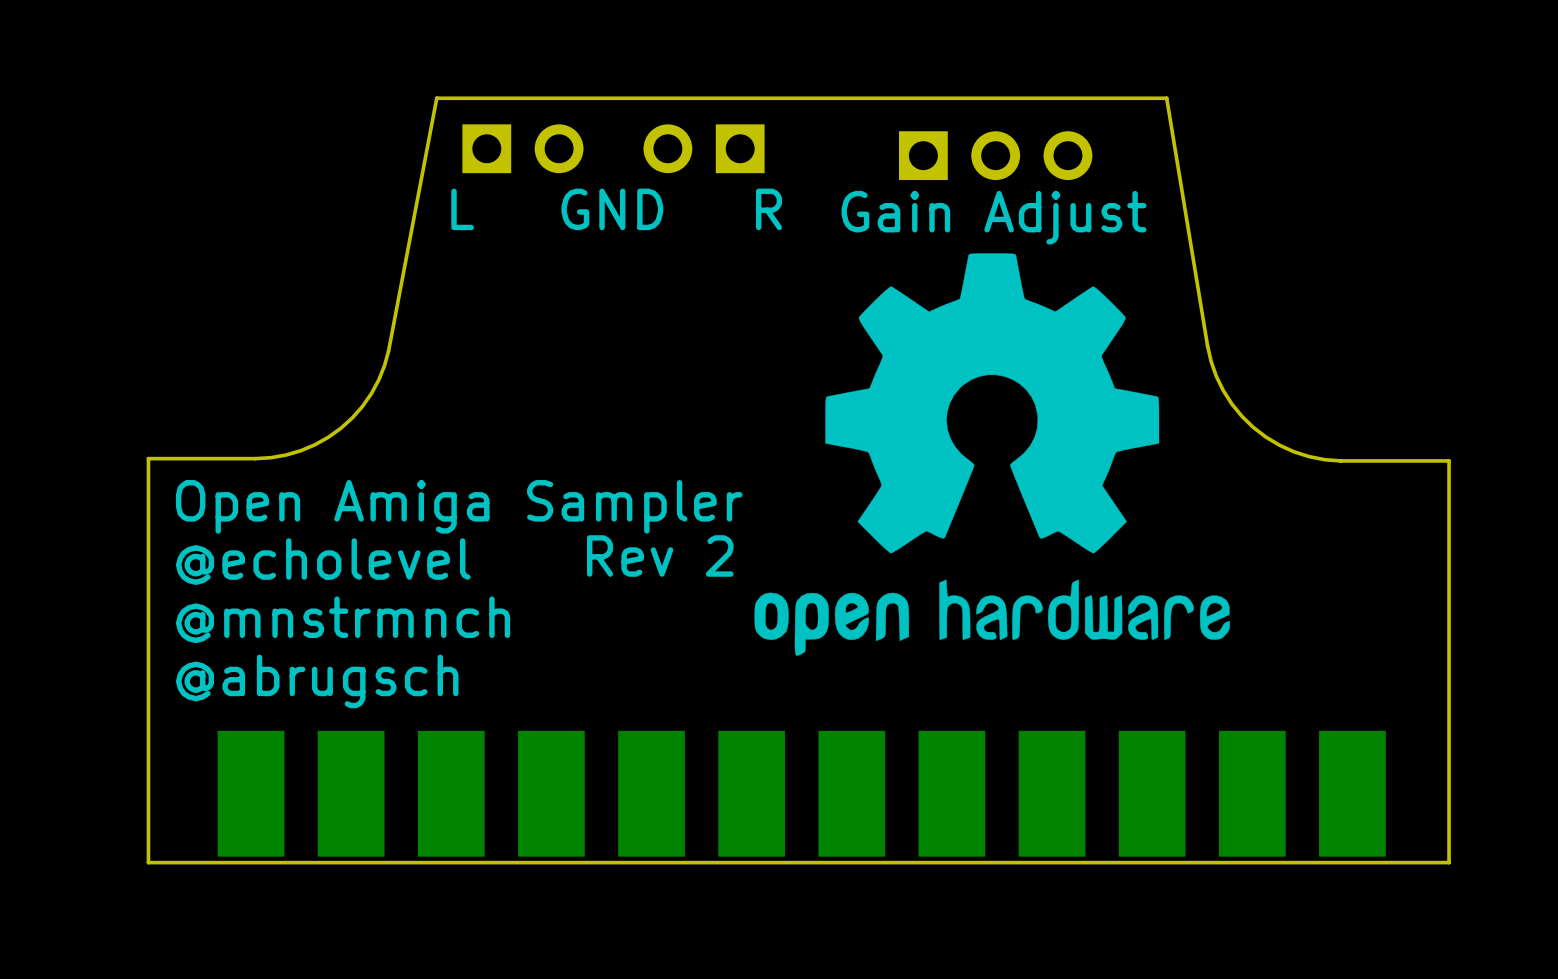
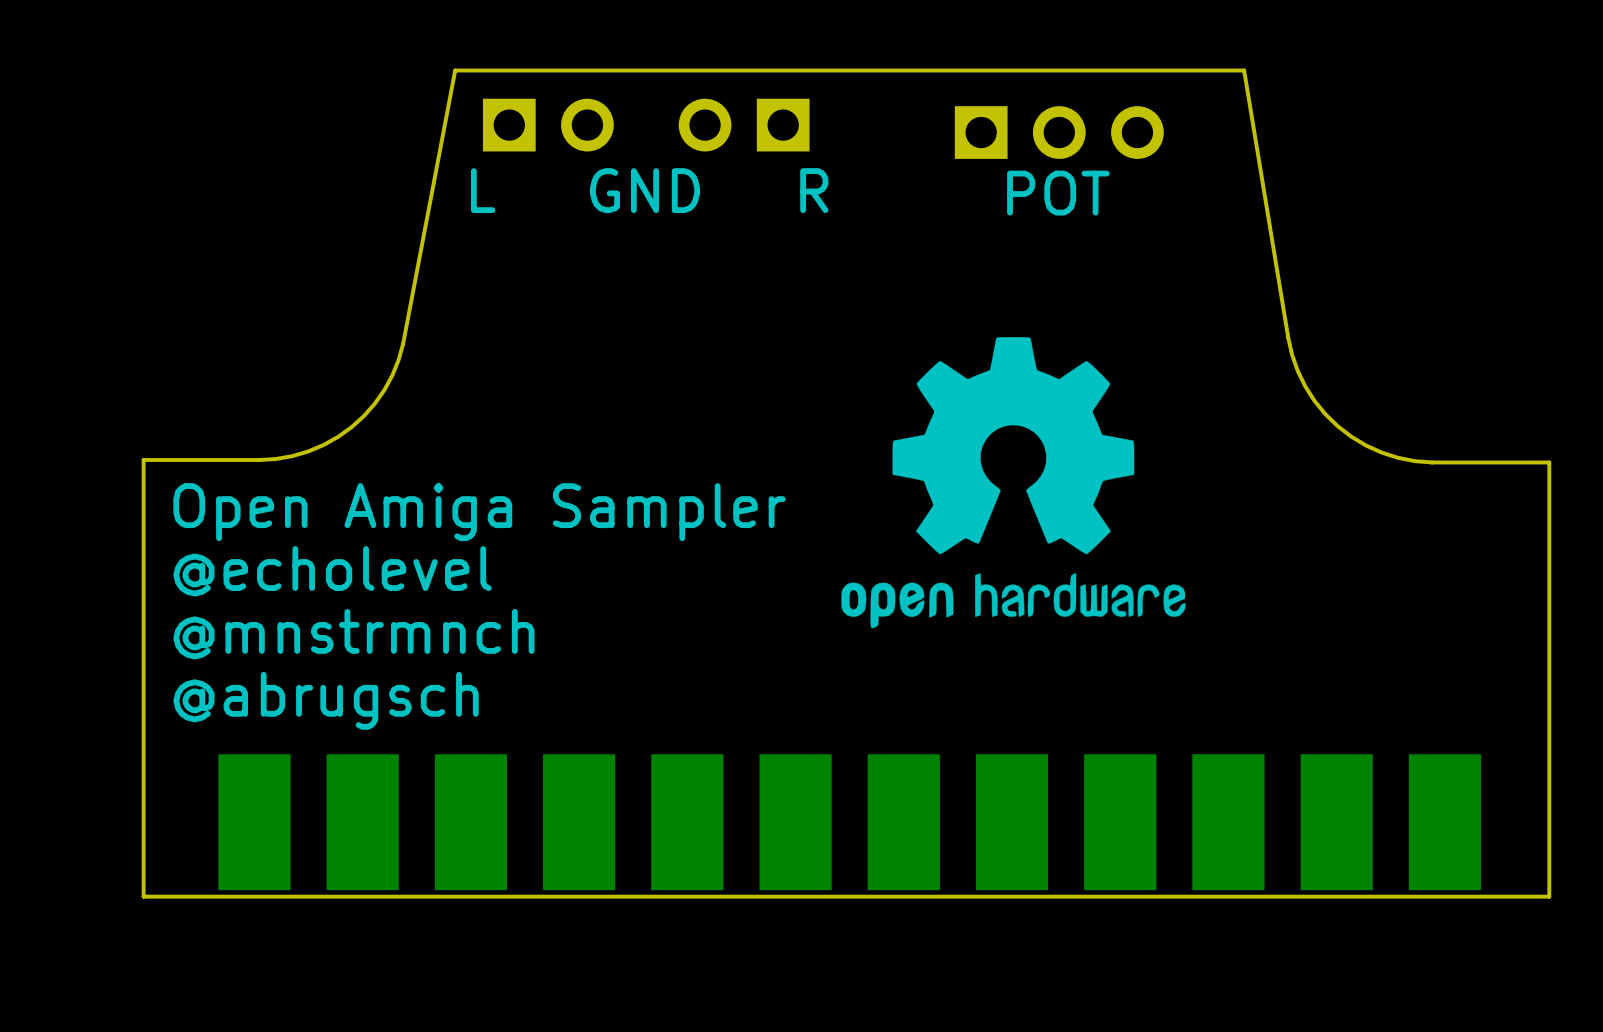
text: Gain Adjust (993, 217) -> POT (1058, 193)
drawing: [754, 253, 1230, 656] -> none
drawing: none -> [841, 337, 1186, 629]
text: Rev 2 (660, 555) -> none

